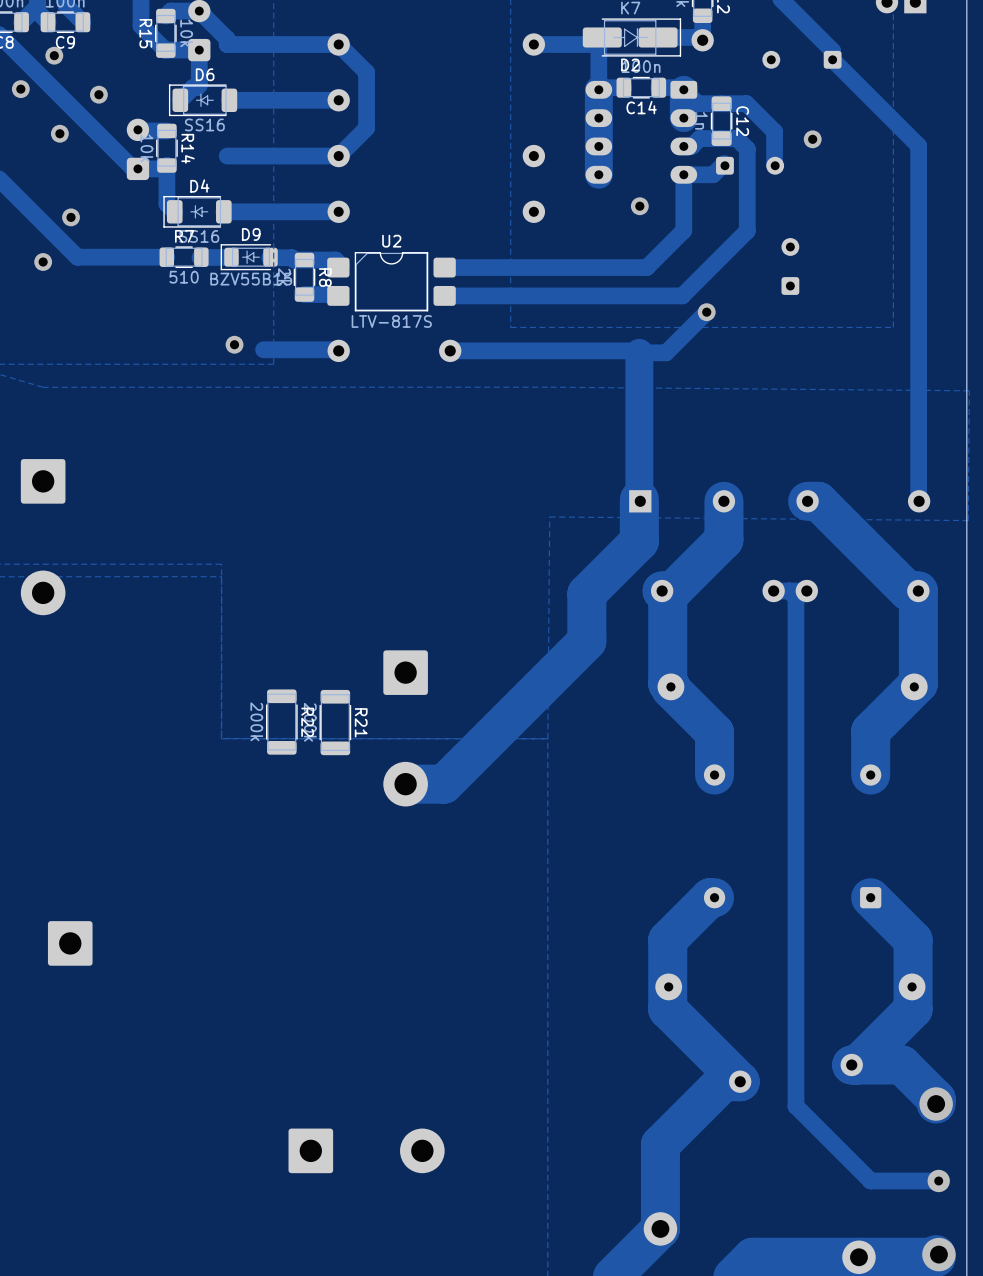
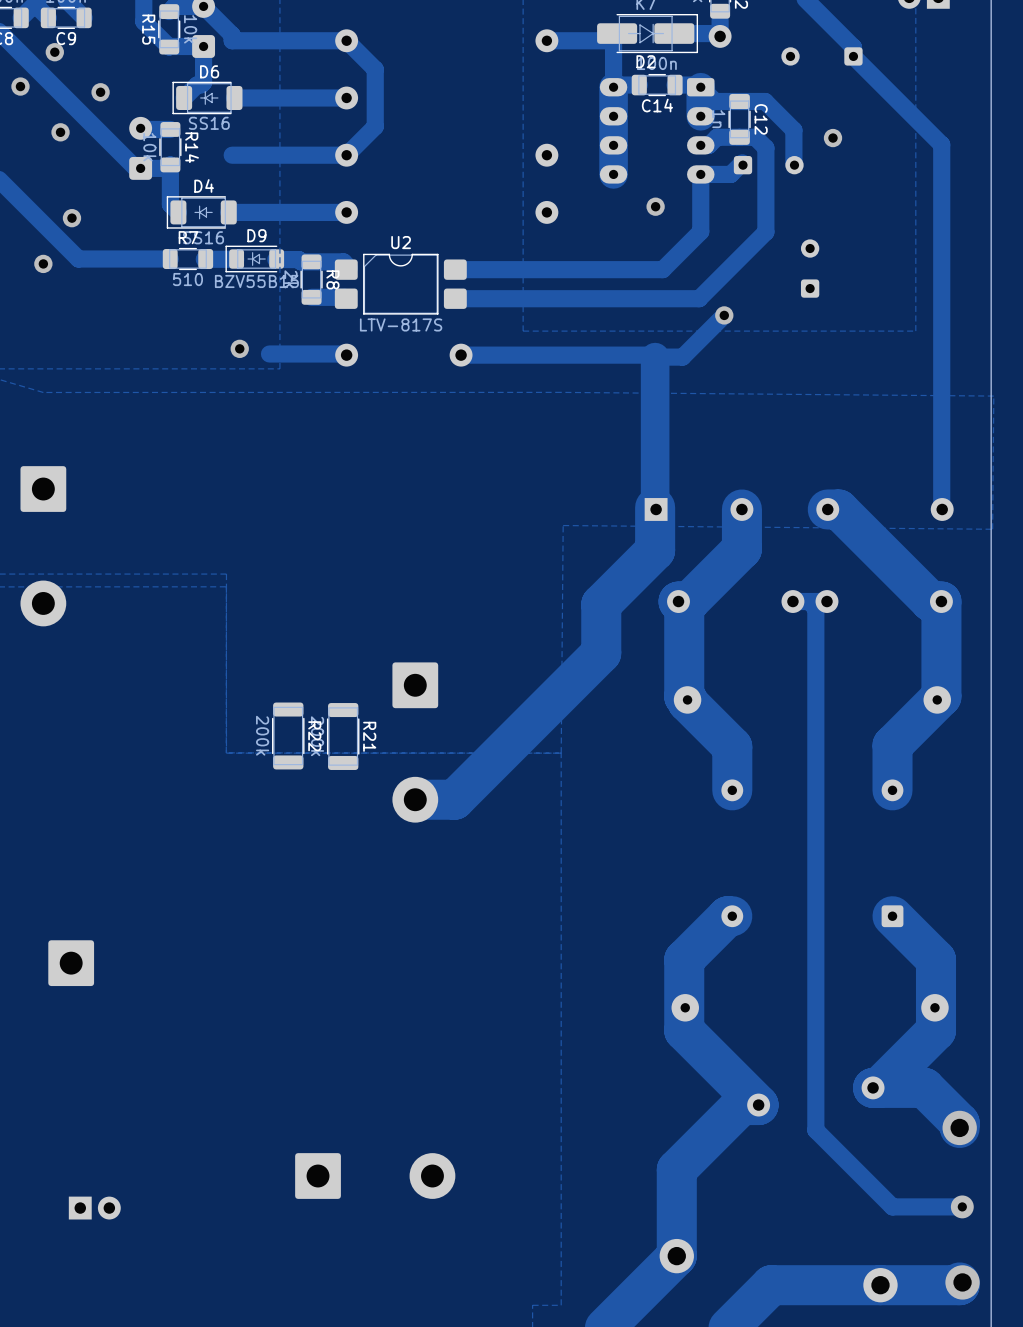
part: none -> (94, 1208)

